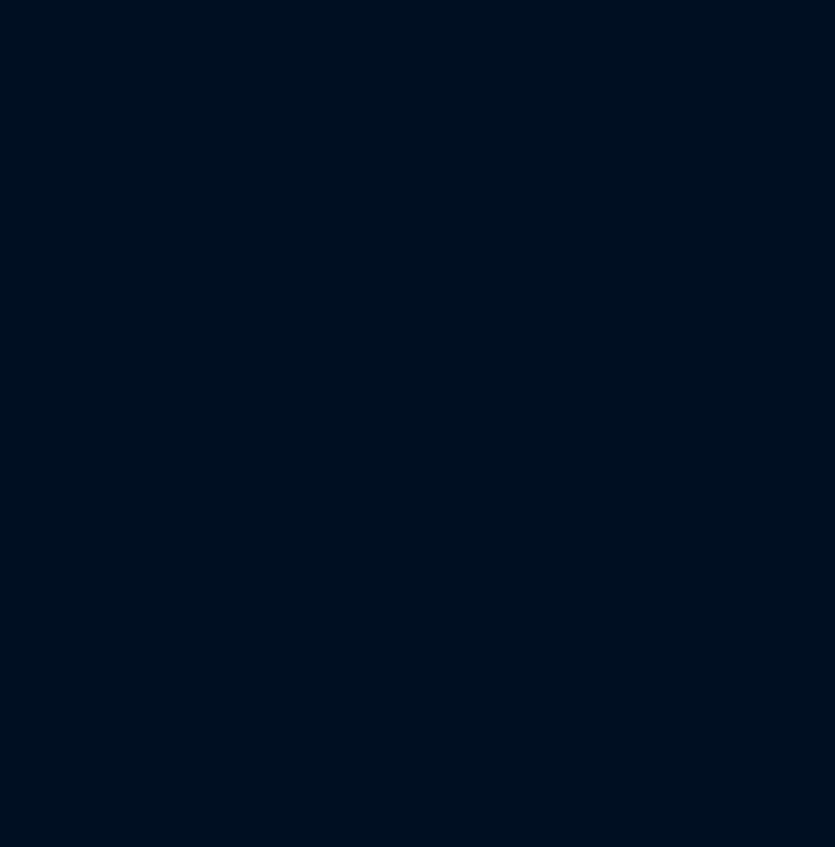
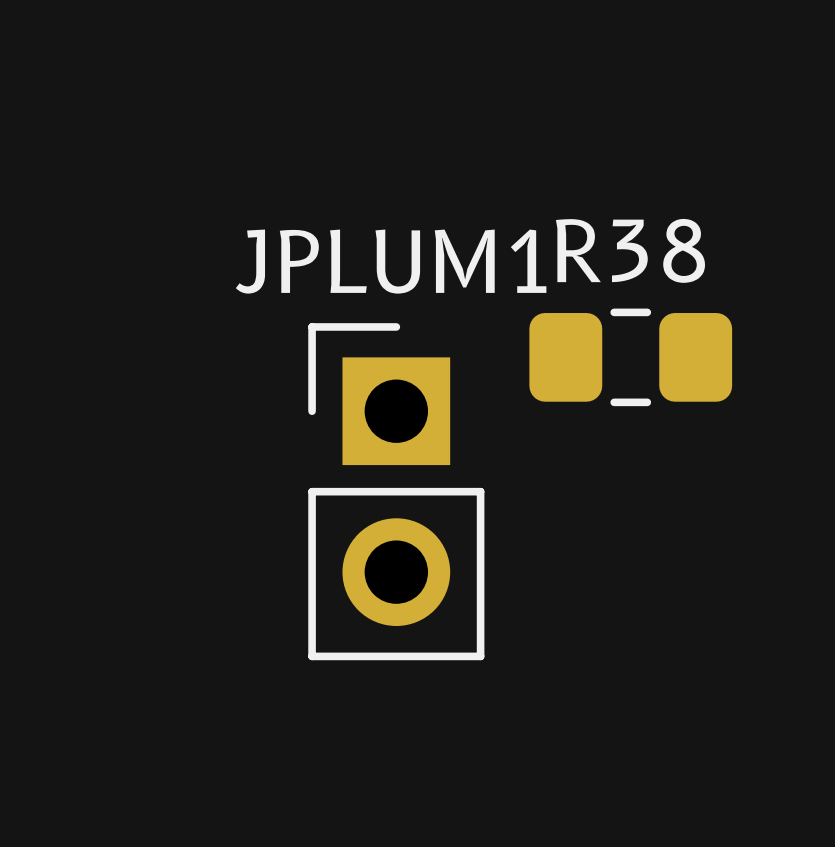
R38: none -> (630, 357)
JPLUM1: none -> (396, 491)

